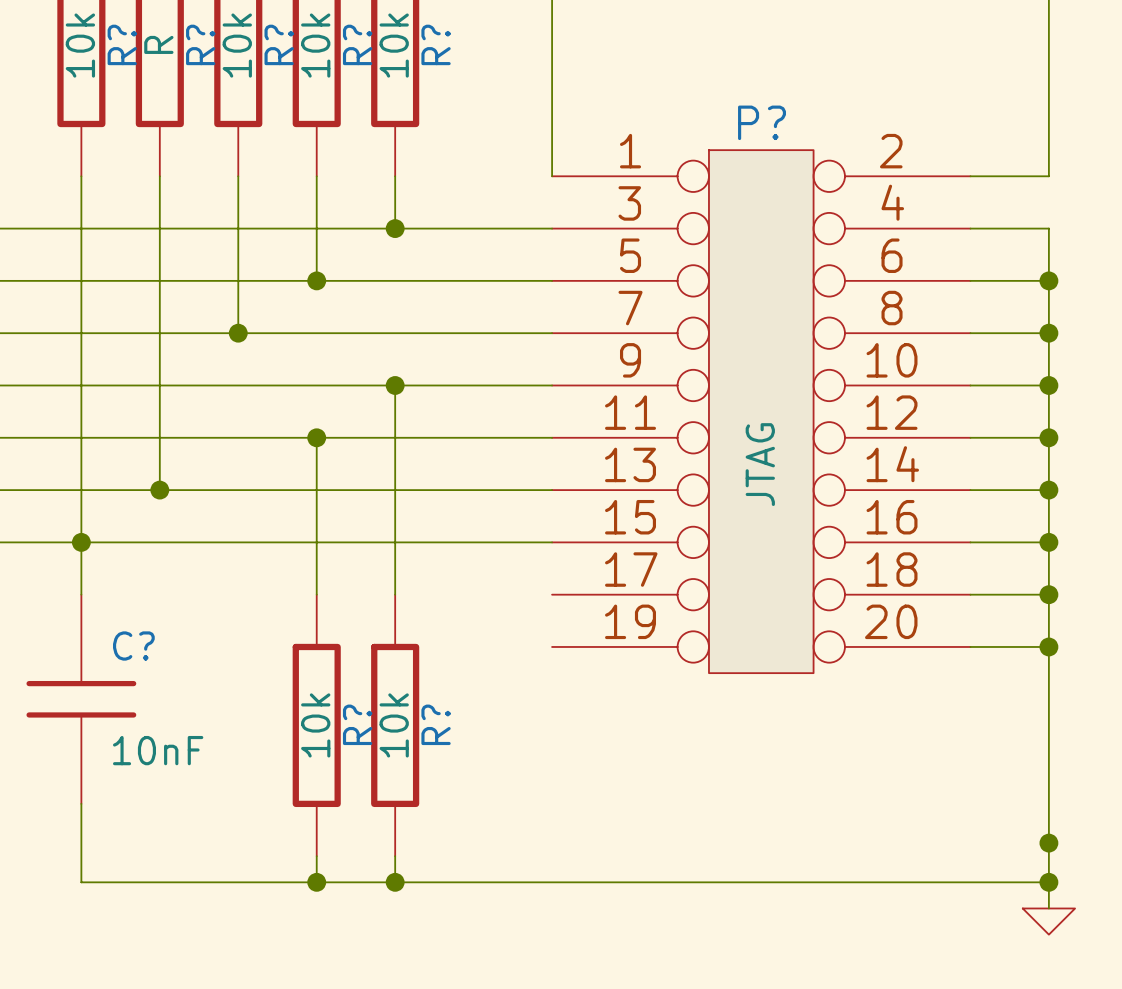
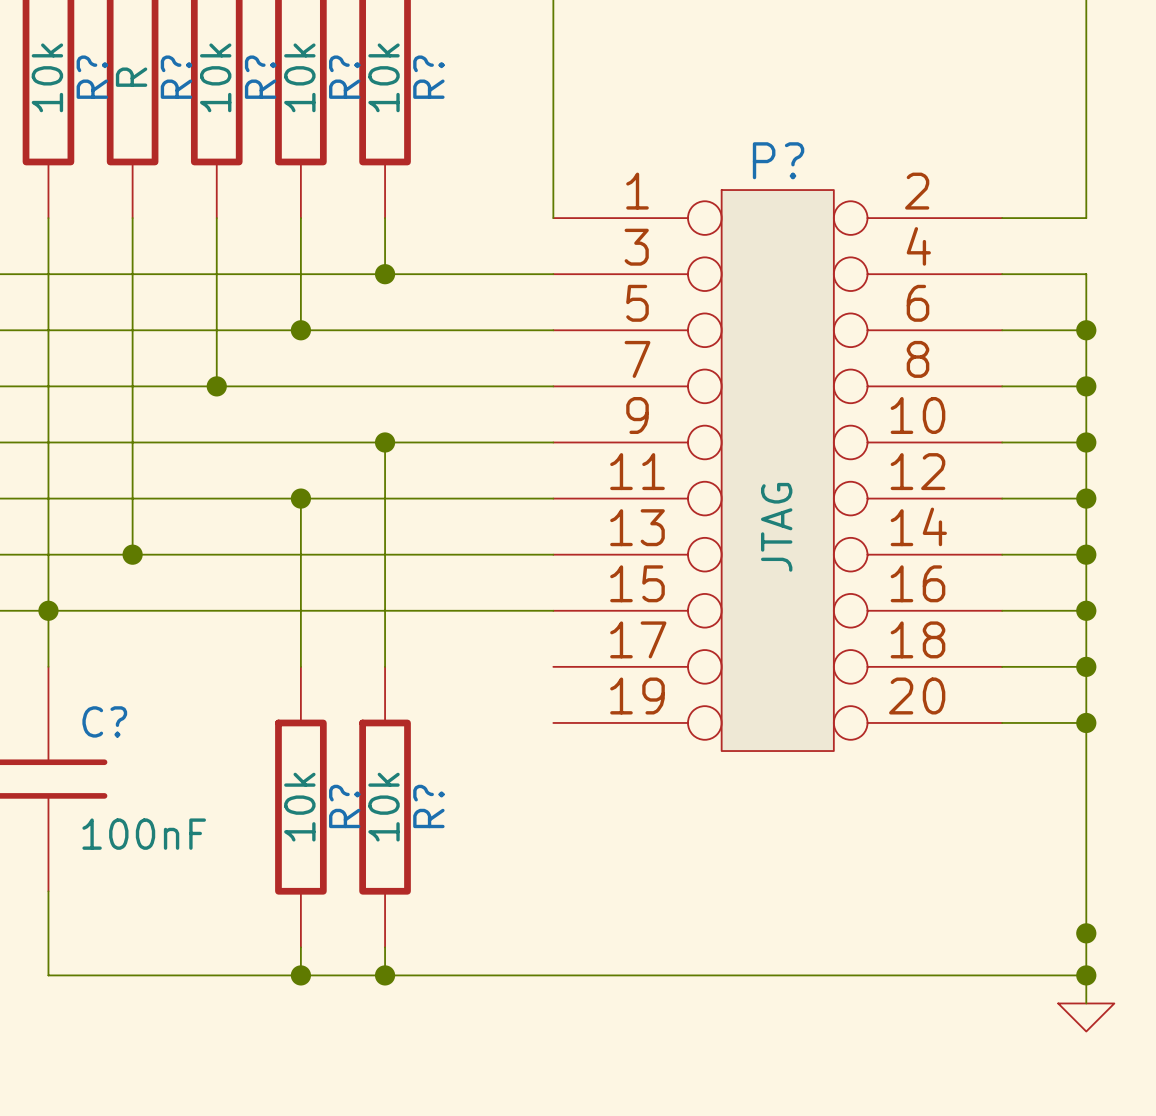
C? value: 10nF (158, 750) -> 100nF (144, 834)

